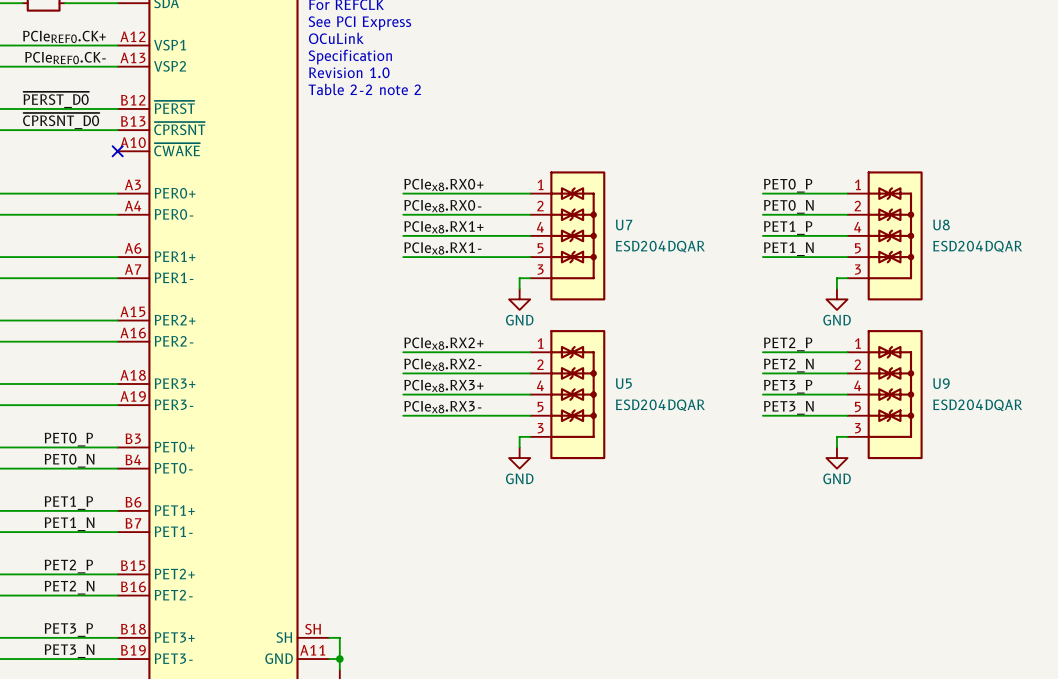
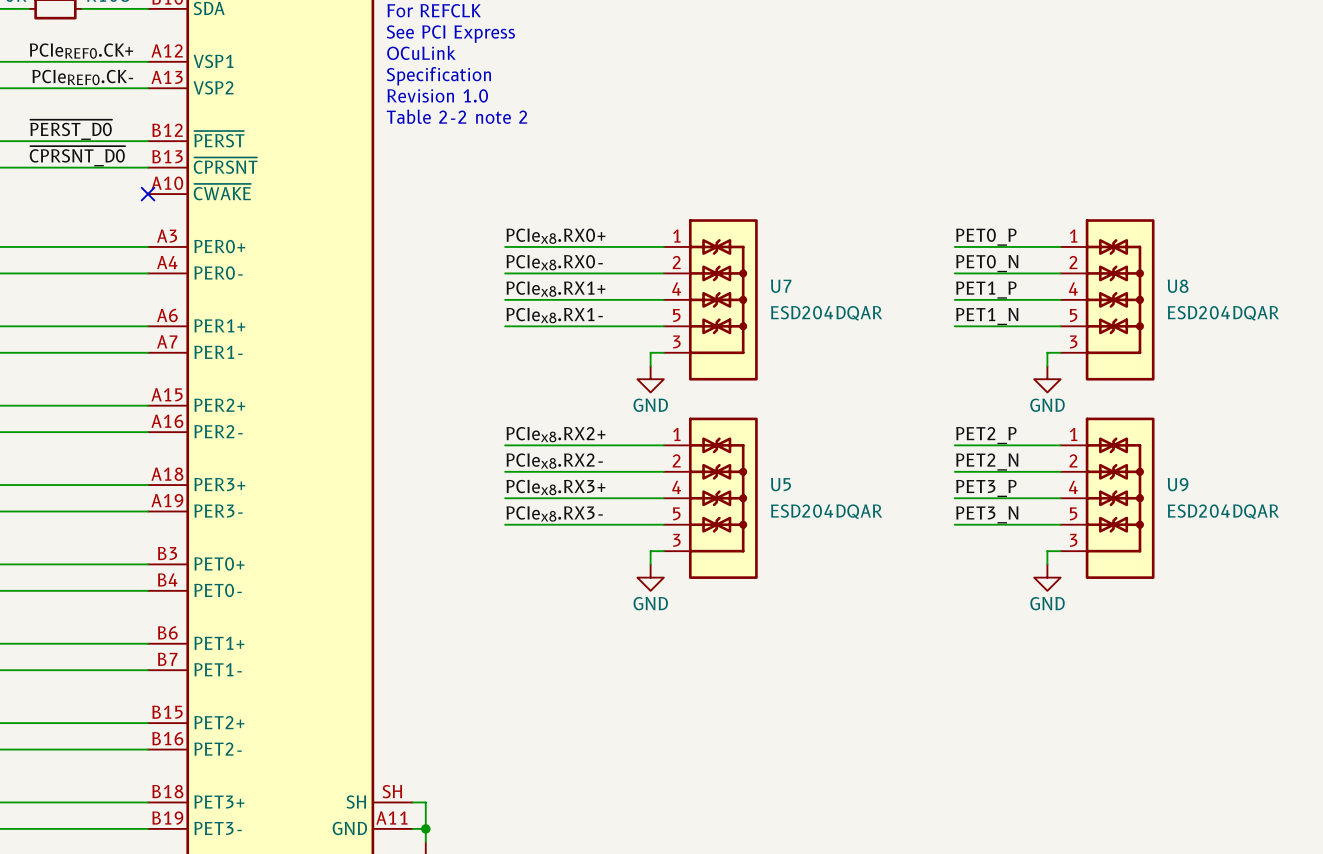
label: PET0_P (68, 439) -> none
label: PET0_N (69, 460) -> none
label: PET1_P (68, 503) -> none
label: PET1_N (69, 524) -> none
label: PET2_P (68, 566) -> none
label: PET2_N (69, 587) -> none
label: PET3_P (68, 630) -> none
label: PET3_N (69, 651) -> none

